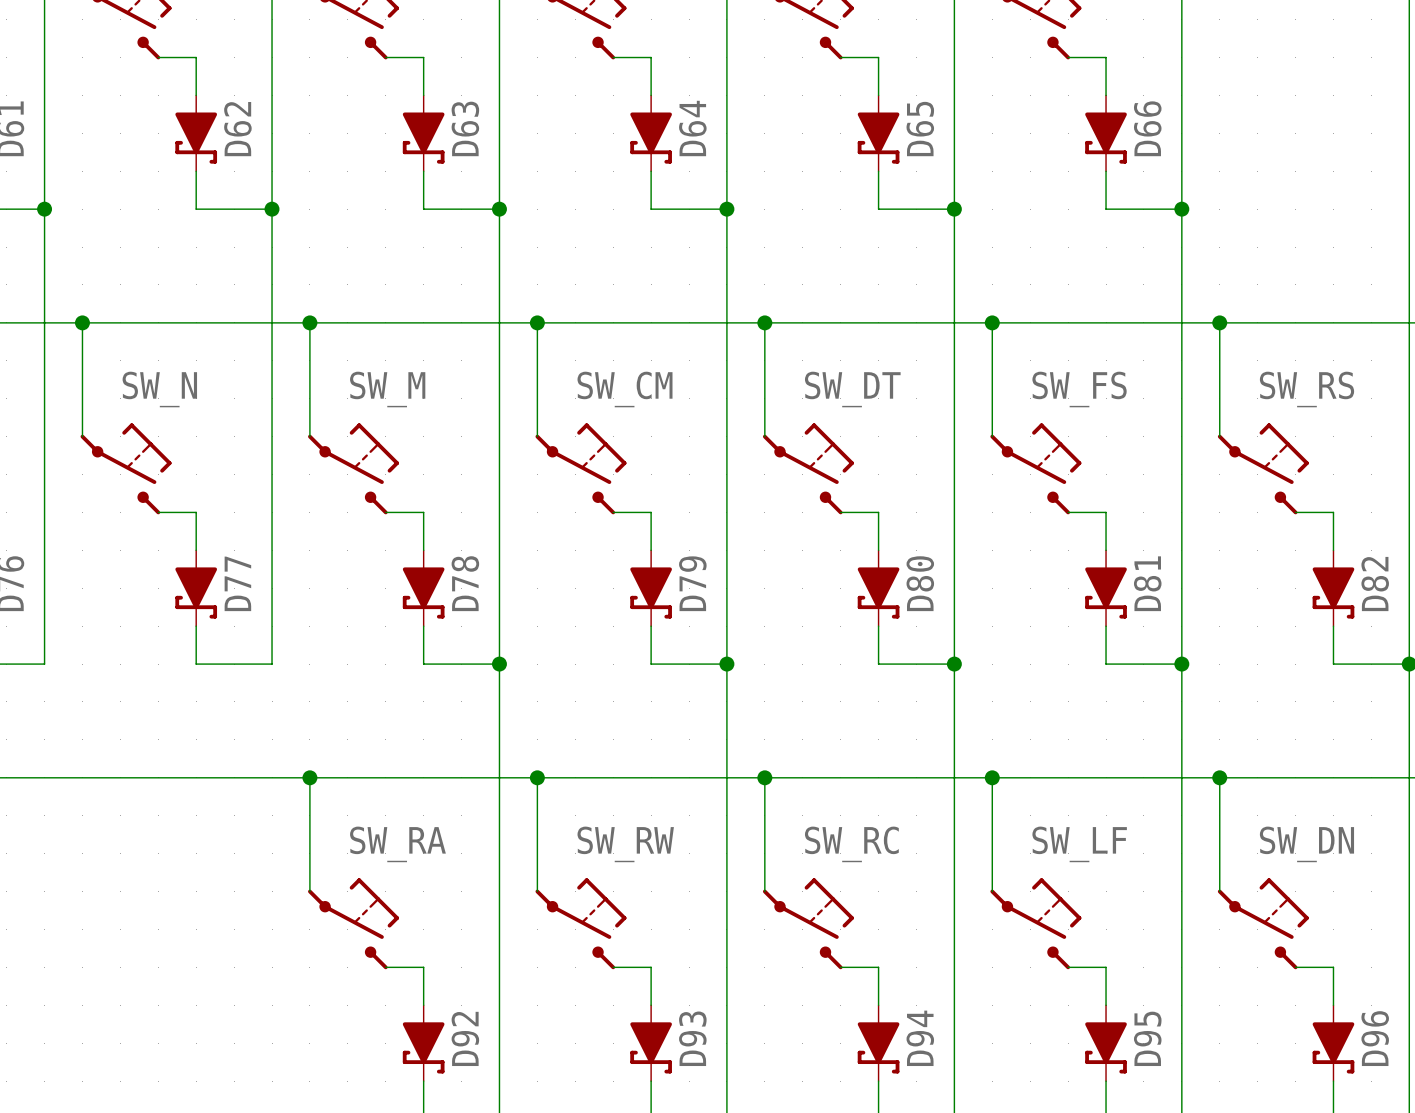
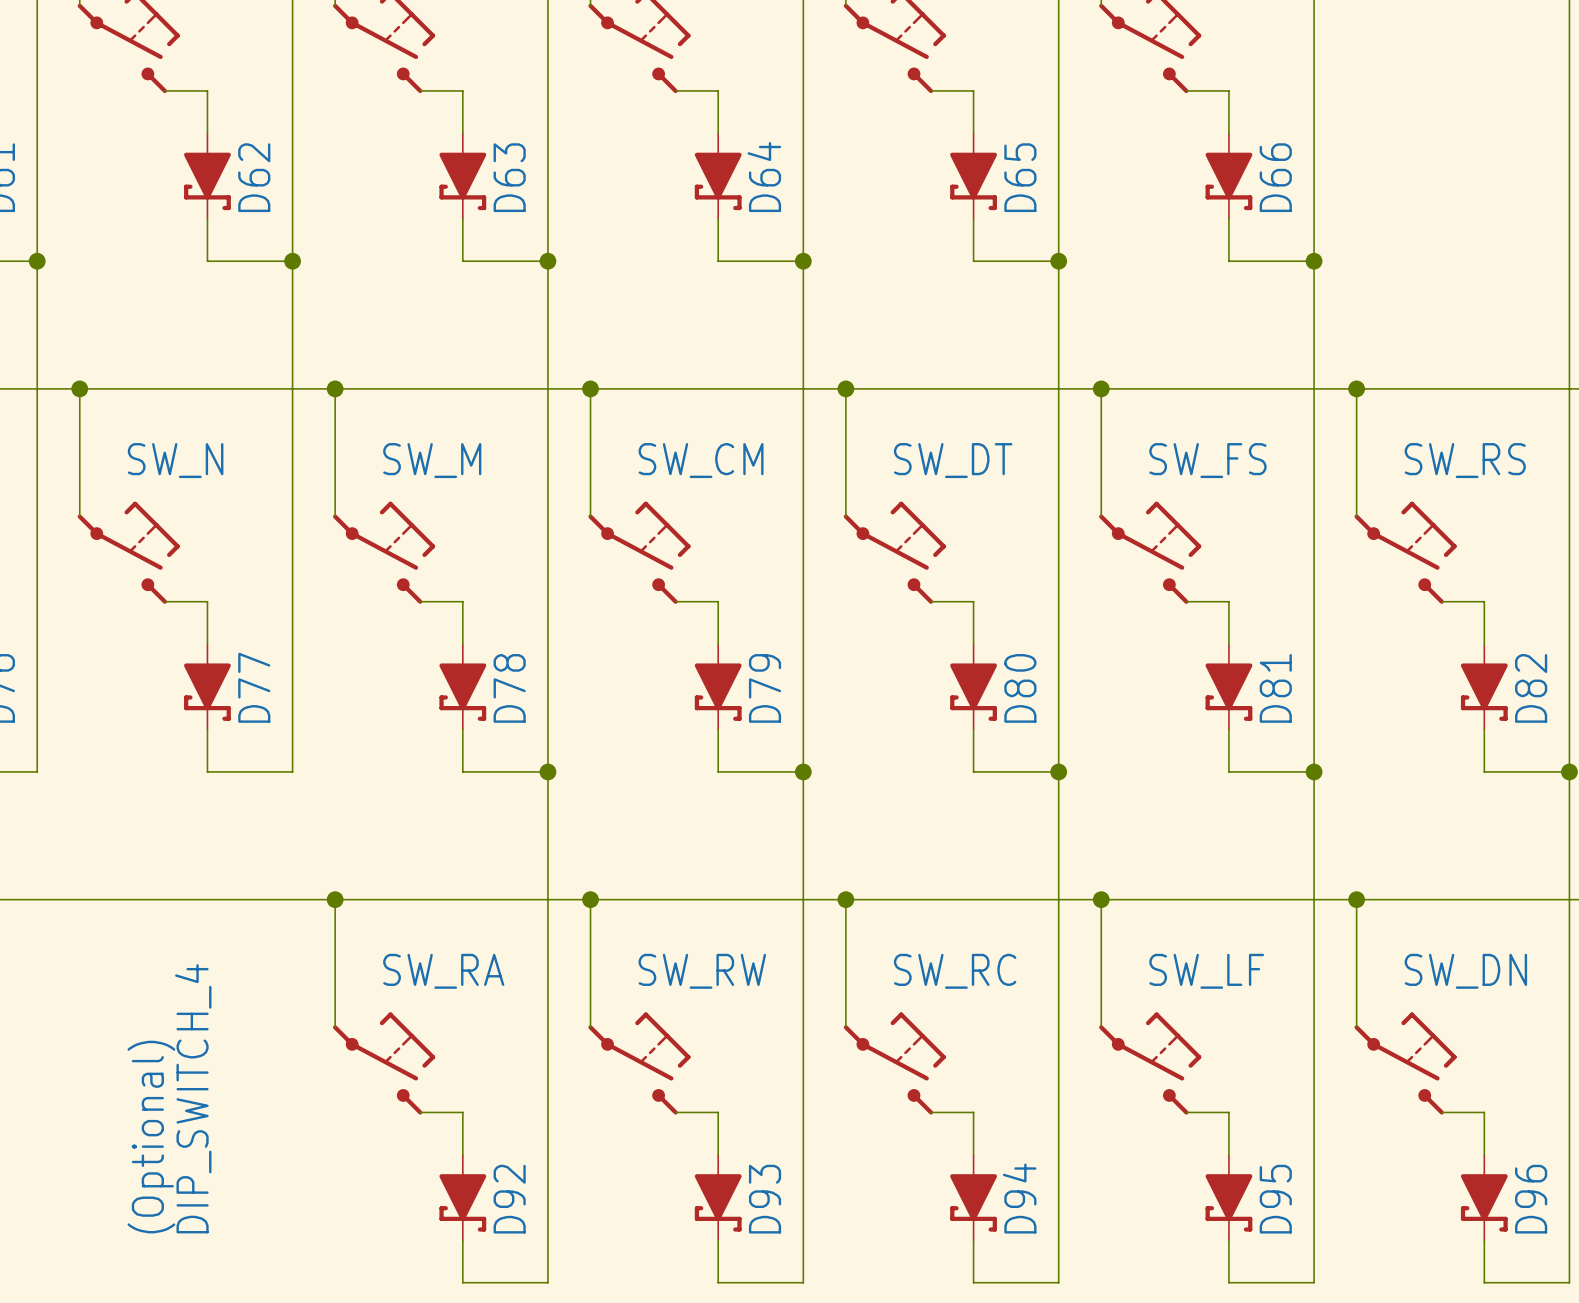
text: none -> DIP_SWITCH_4 (193, 1098)
text: none -> (Optional) (151, 1137)

